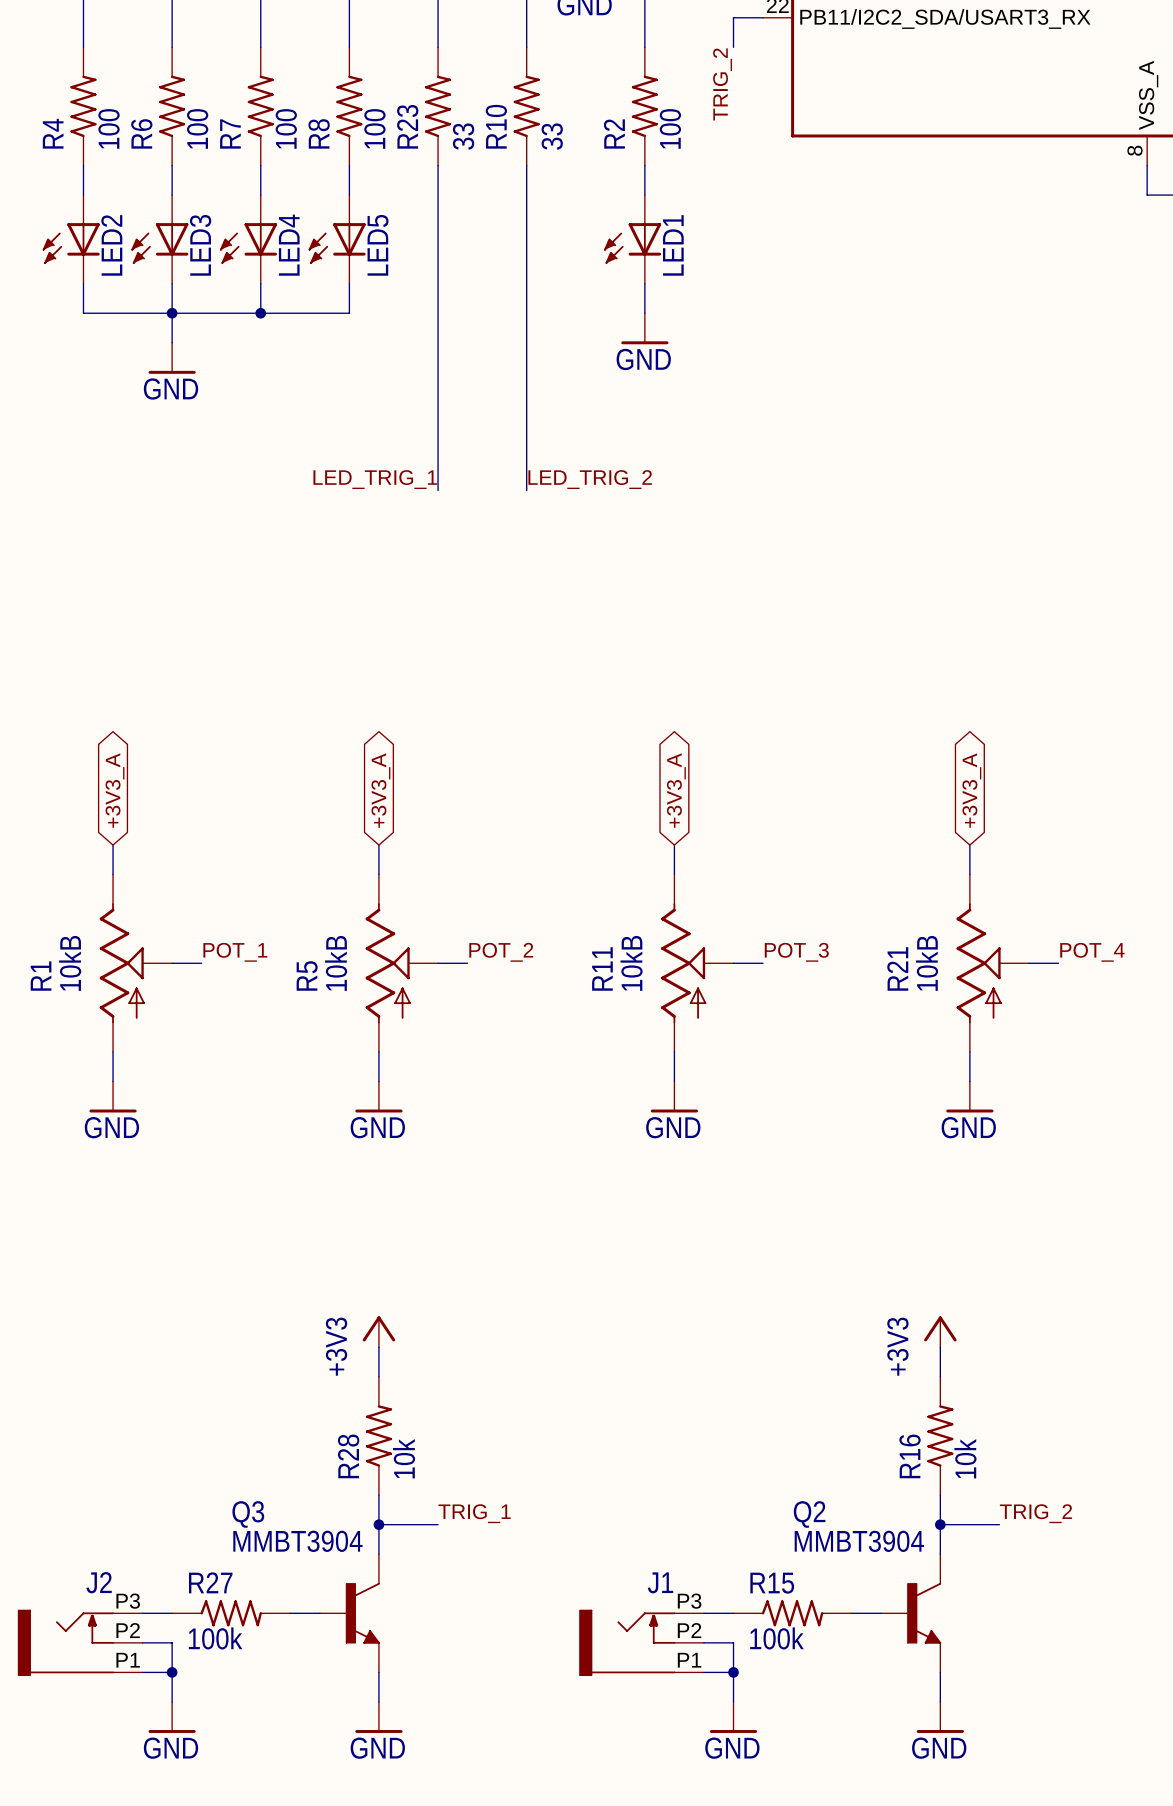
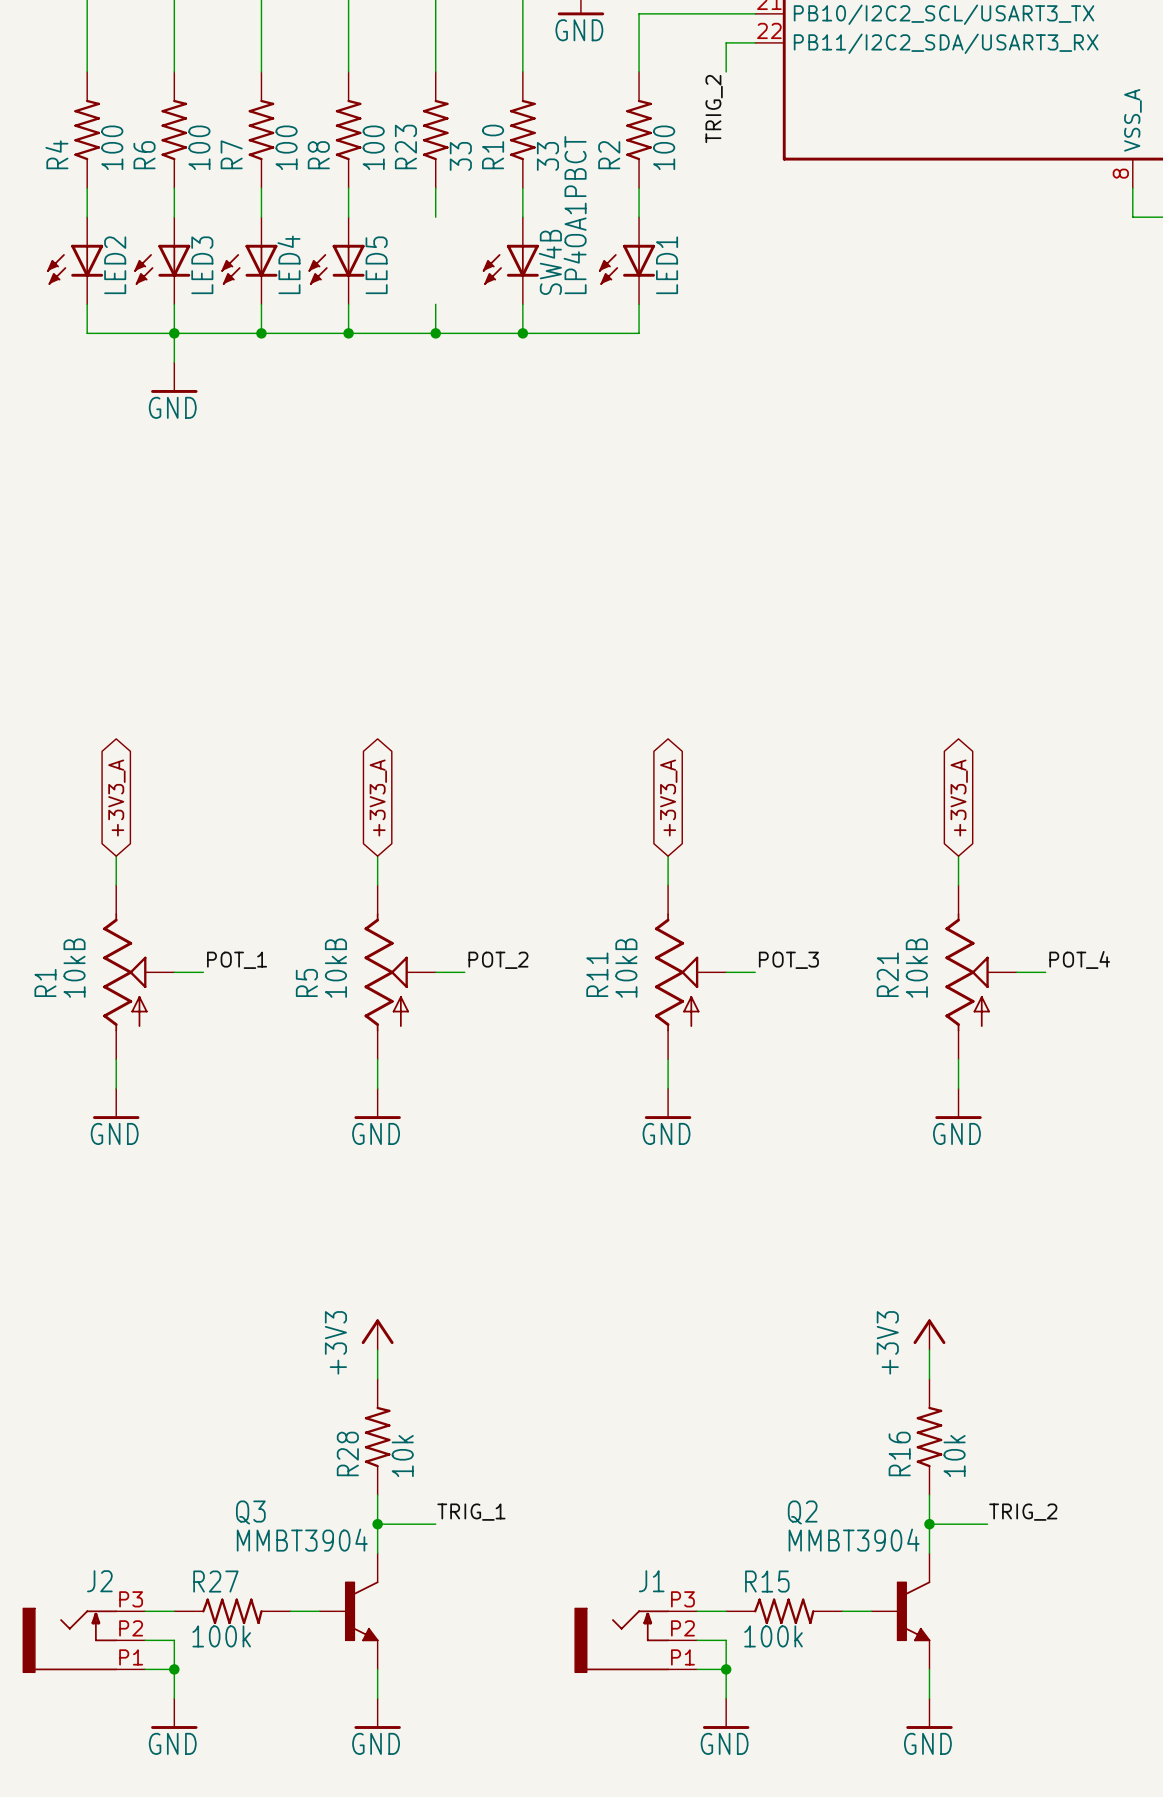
wire: (438, 195) (438, 283) -> none
SW4B: none -> LP4OA1PBCT (510, 260)
wire: none -> (348, 333) (639, 333)
junction: none -> (348, 333)
wire: (438, 313) (438, 490) -> none
junction: none -> (435, 333)
wire: (526, 313) (526, 490) -> none
junction: none -> (522, 333)
power symbol: GND (644, 328) -> none
label: LED_TRIG_1 (375, 479) -> none
label: LED_TRIG_2 (590, 479) -> none

